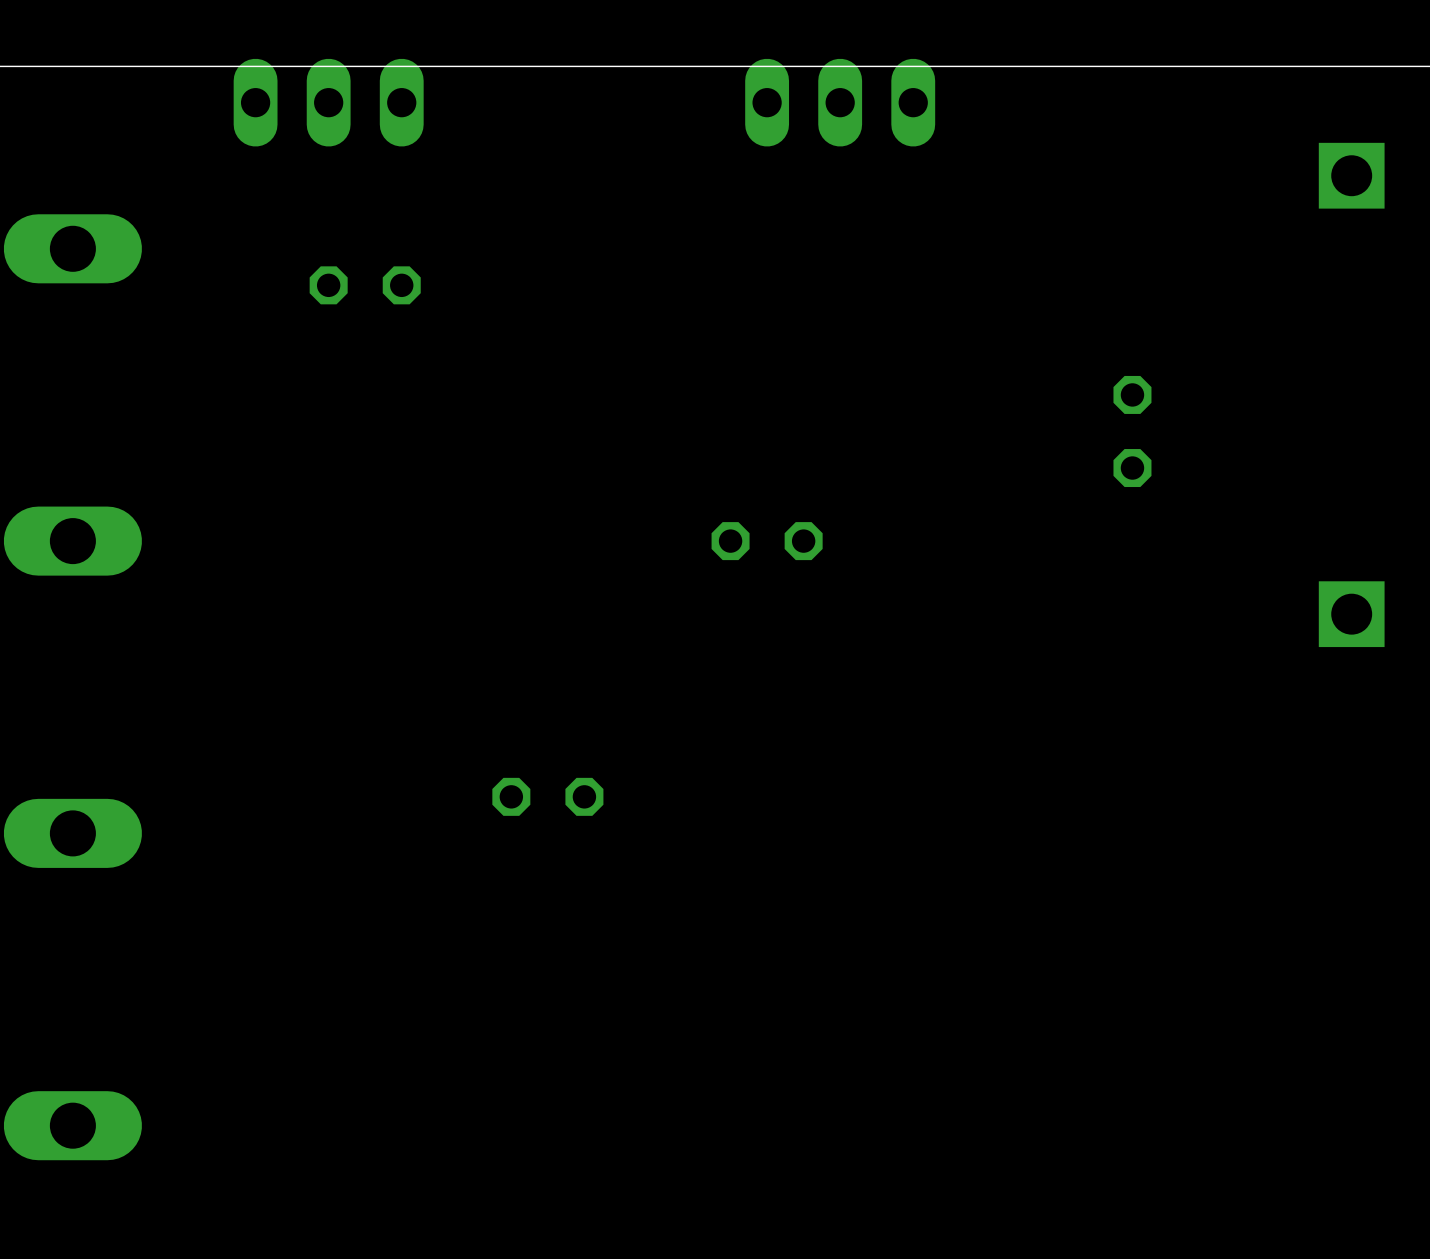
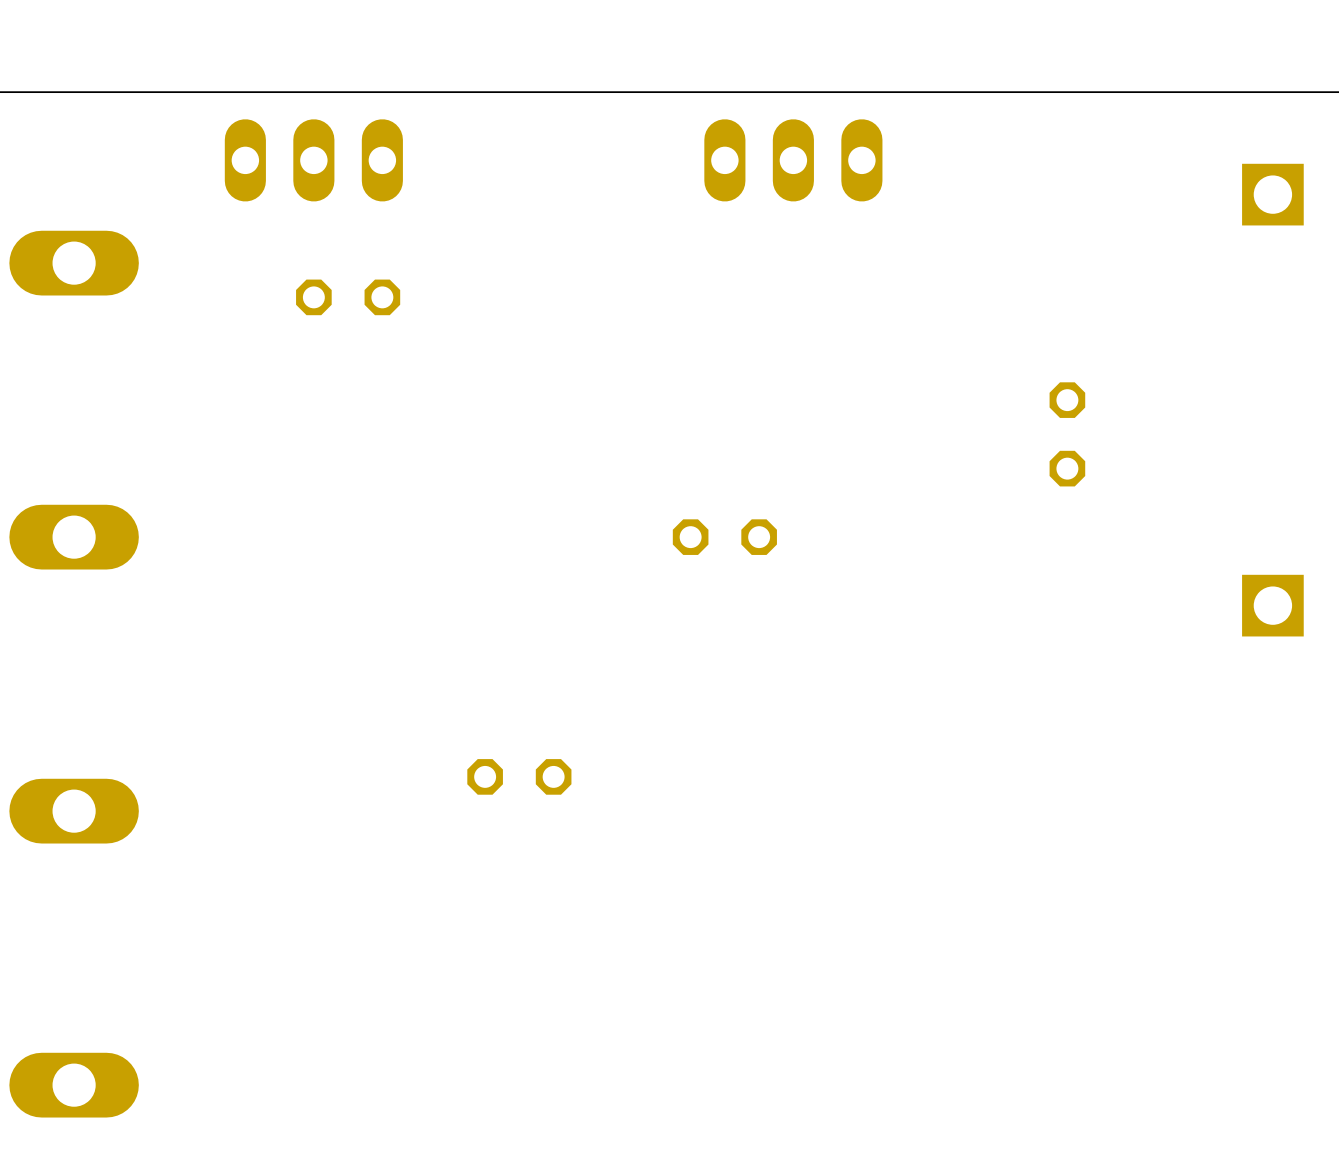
part position: (328, 102) -> (313, 160)
part position: (840, 102) -> (793, 160)

